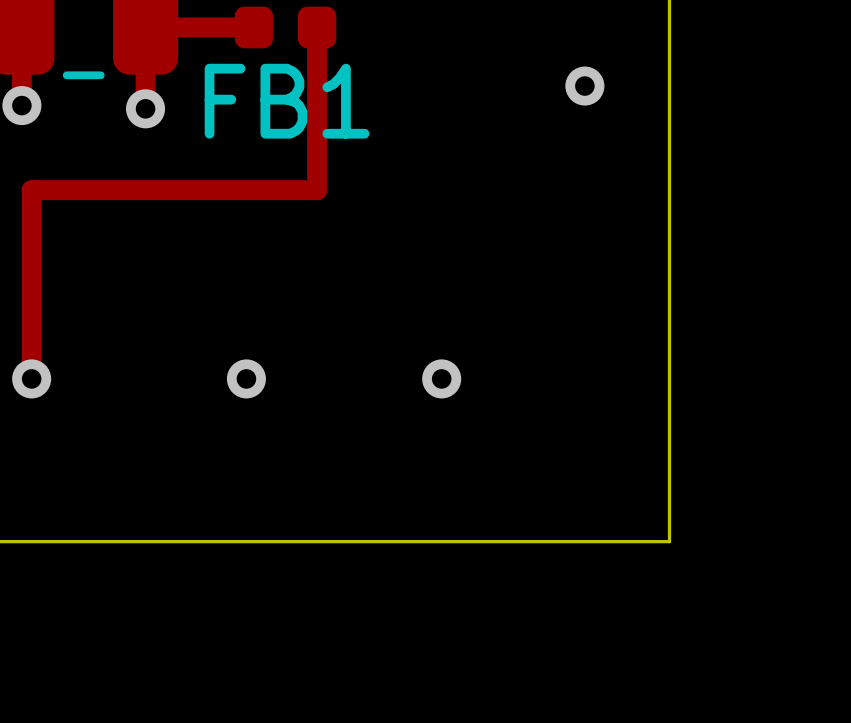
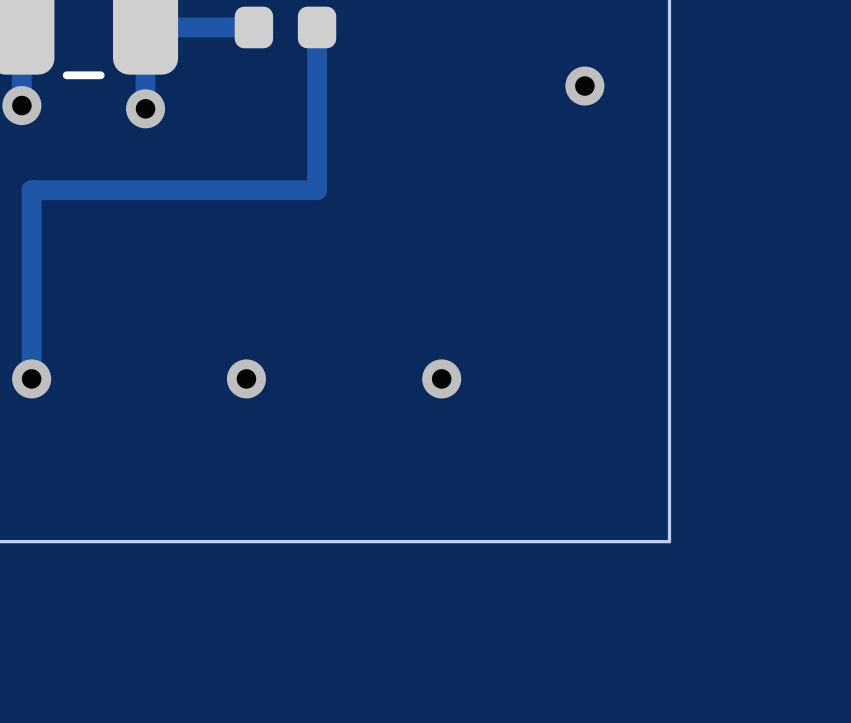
FB1 name: FB1 (287, 101) -> none

